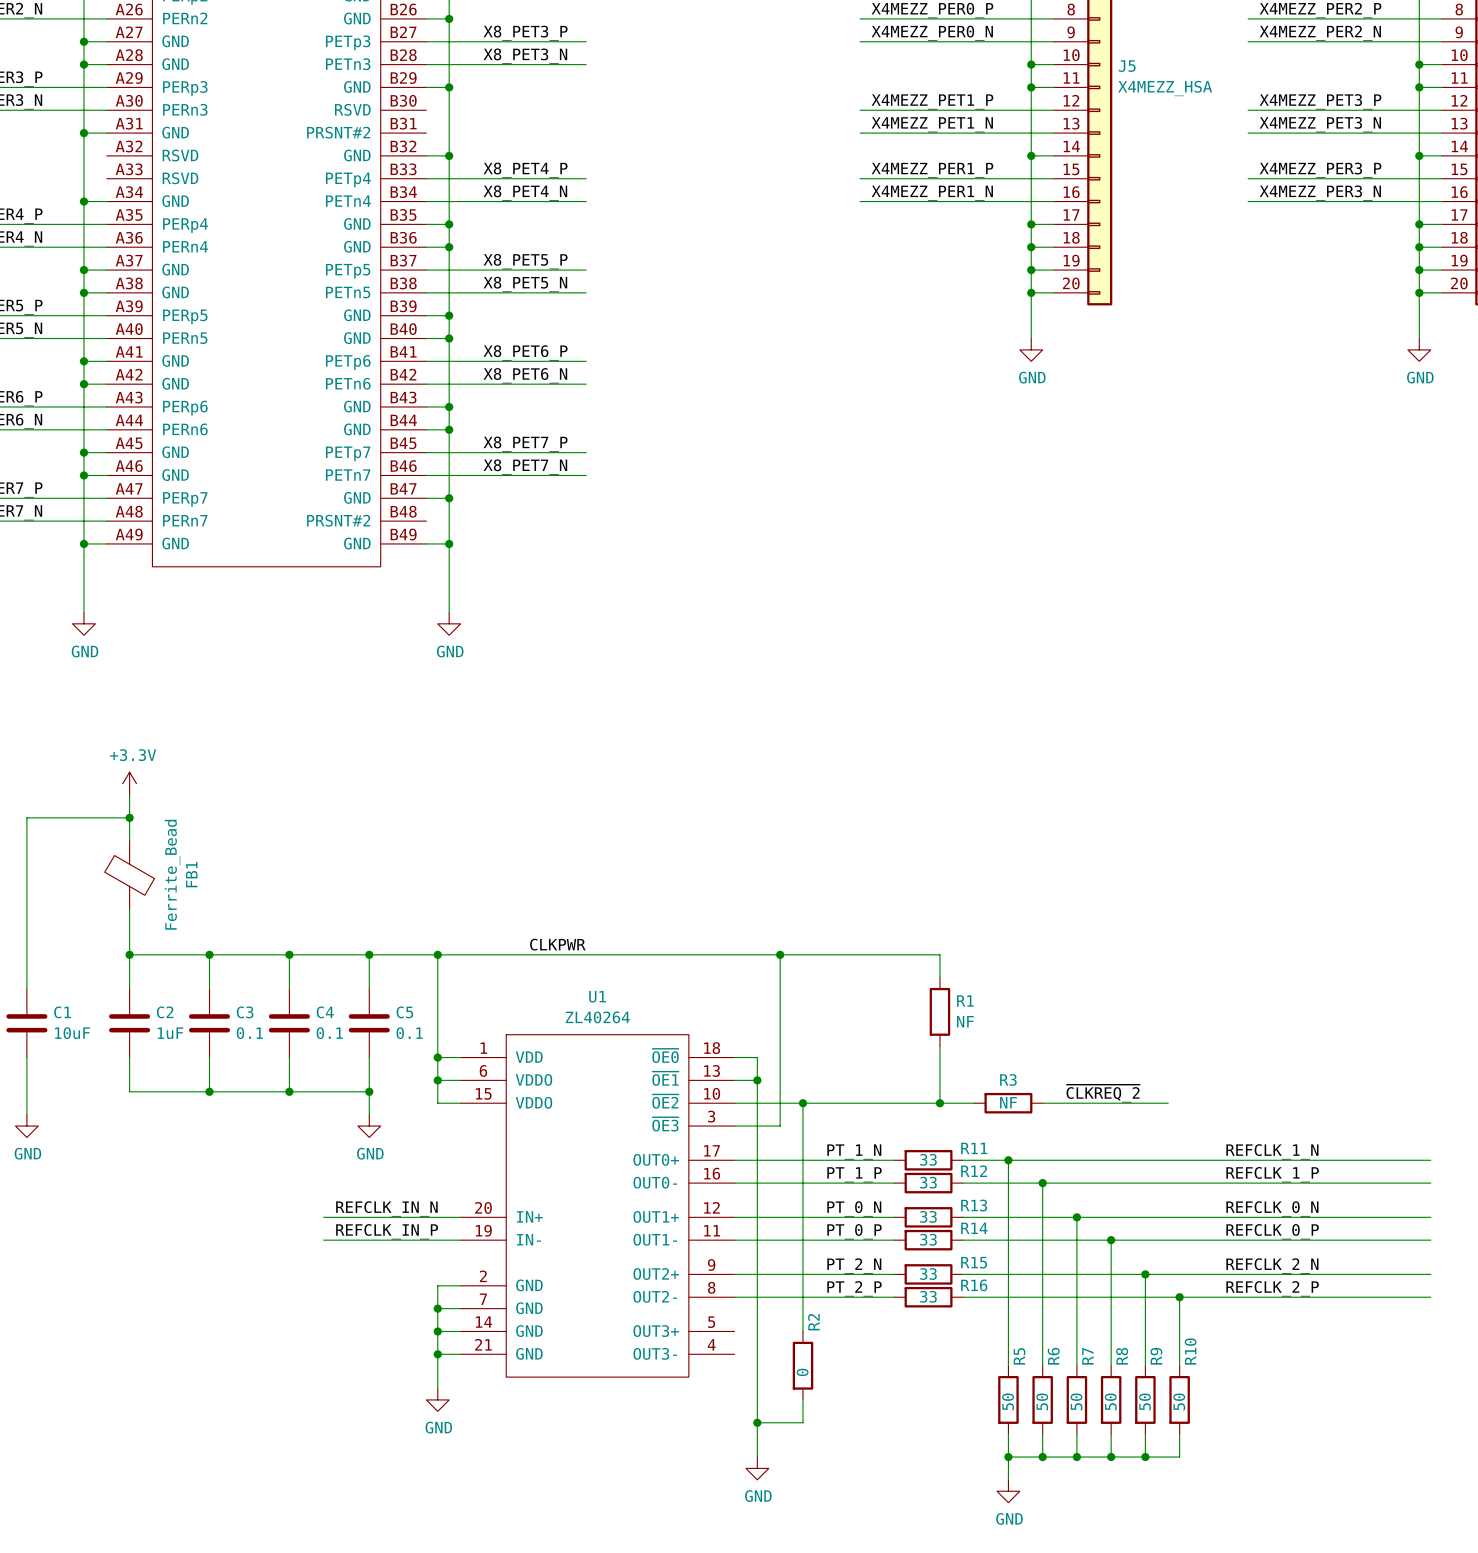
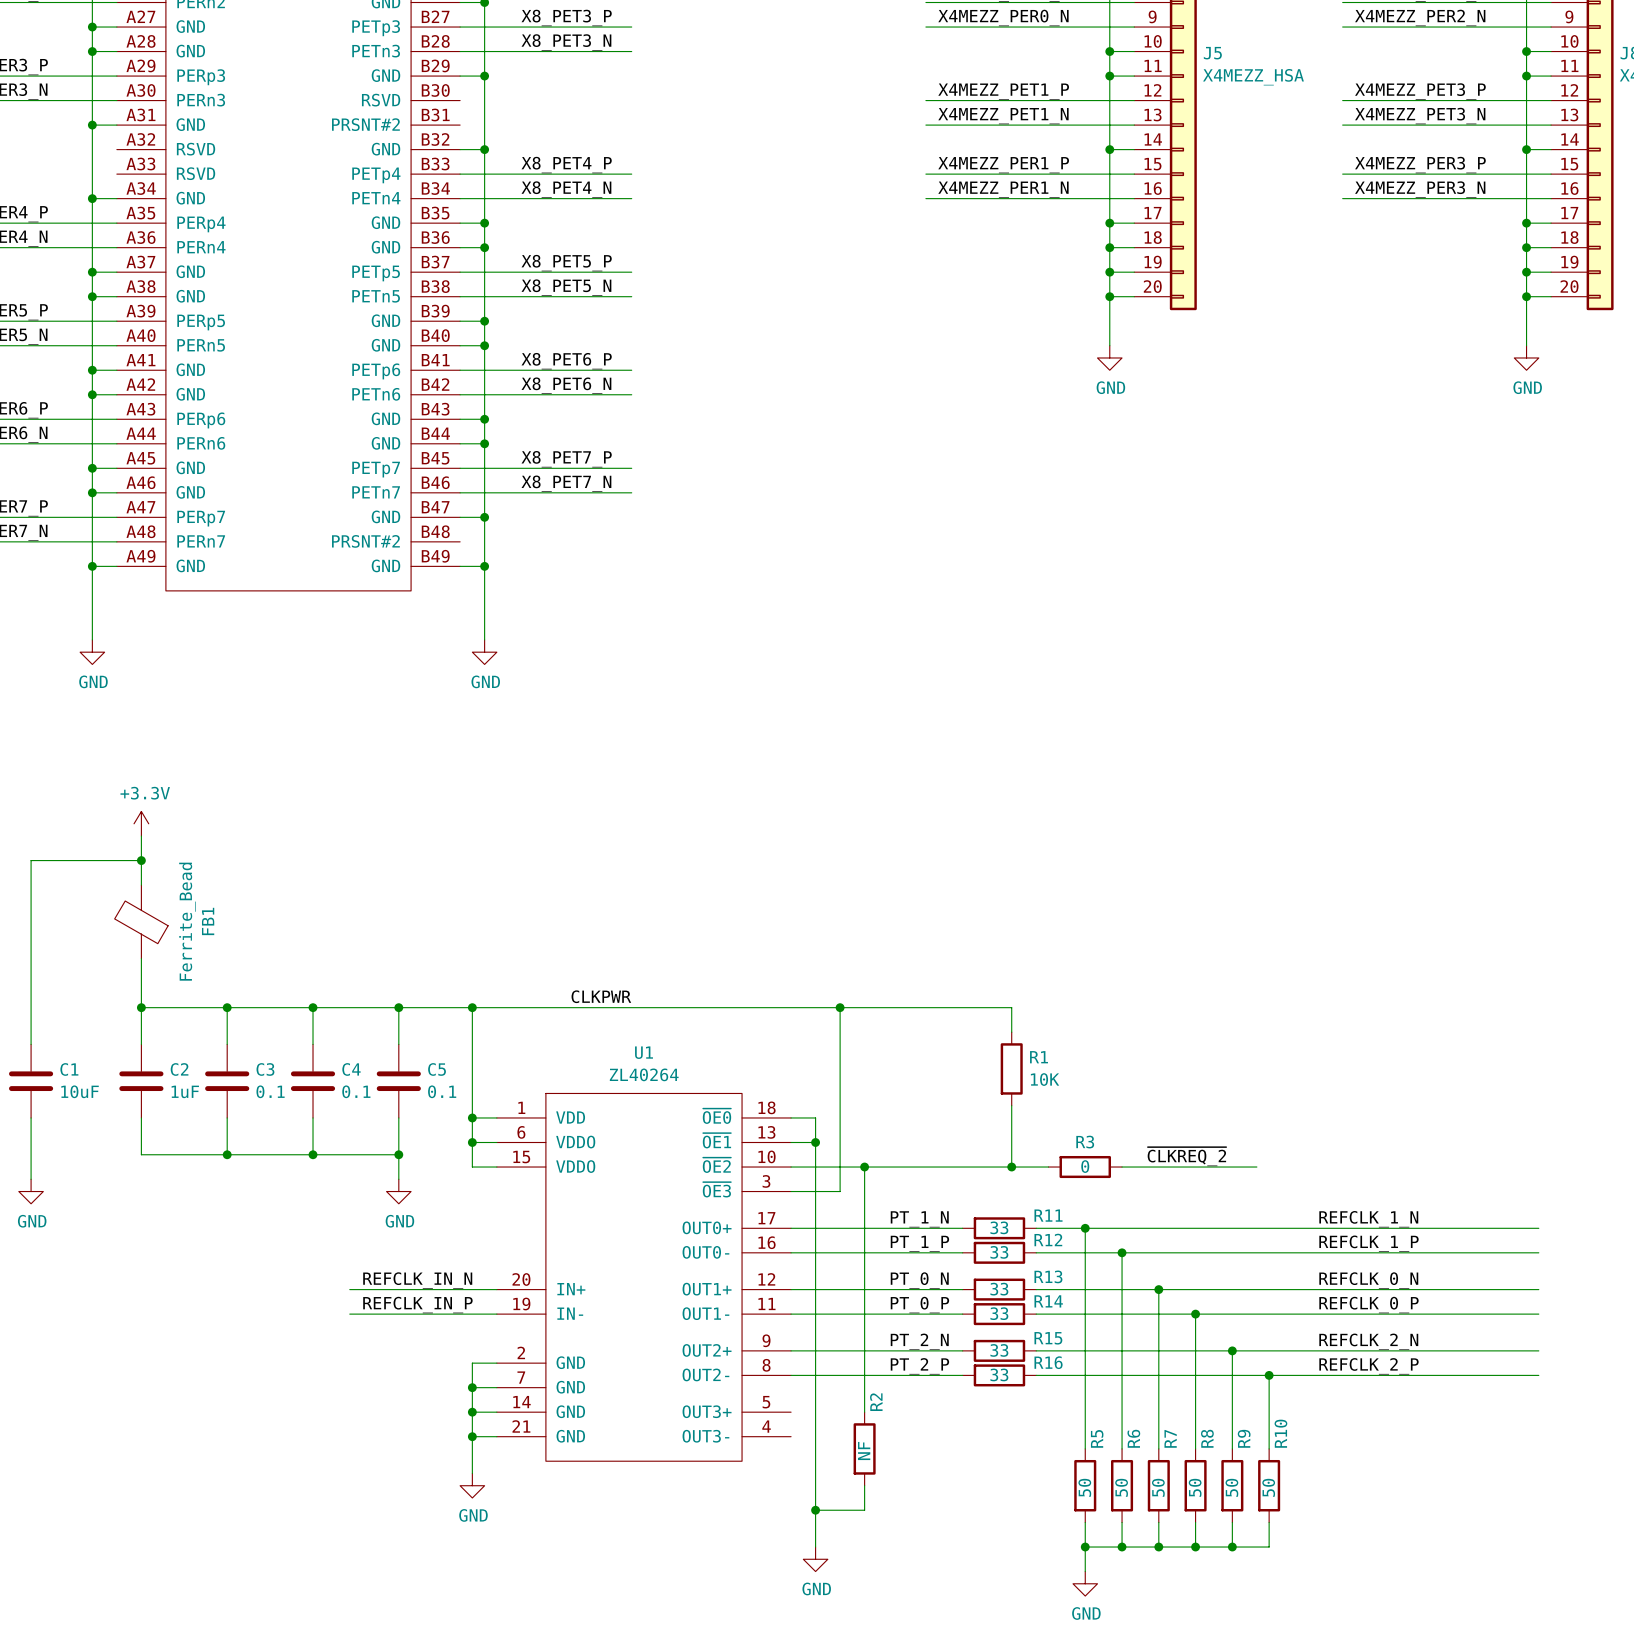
R1 value: NF (965, 1021) -> 10K (1045, 1079)
R3 value: NF (1008, 1102) -> 0 (1085, 1166)
R2 value: 0 (802, 1372) -> NF (864, 1451)

